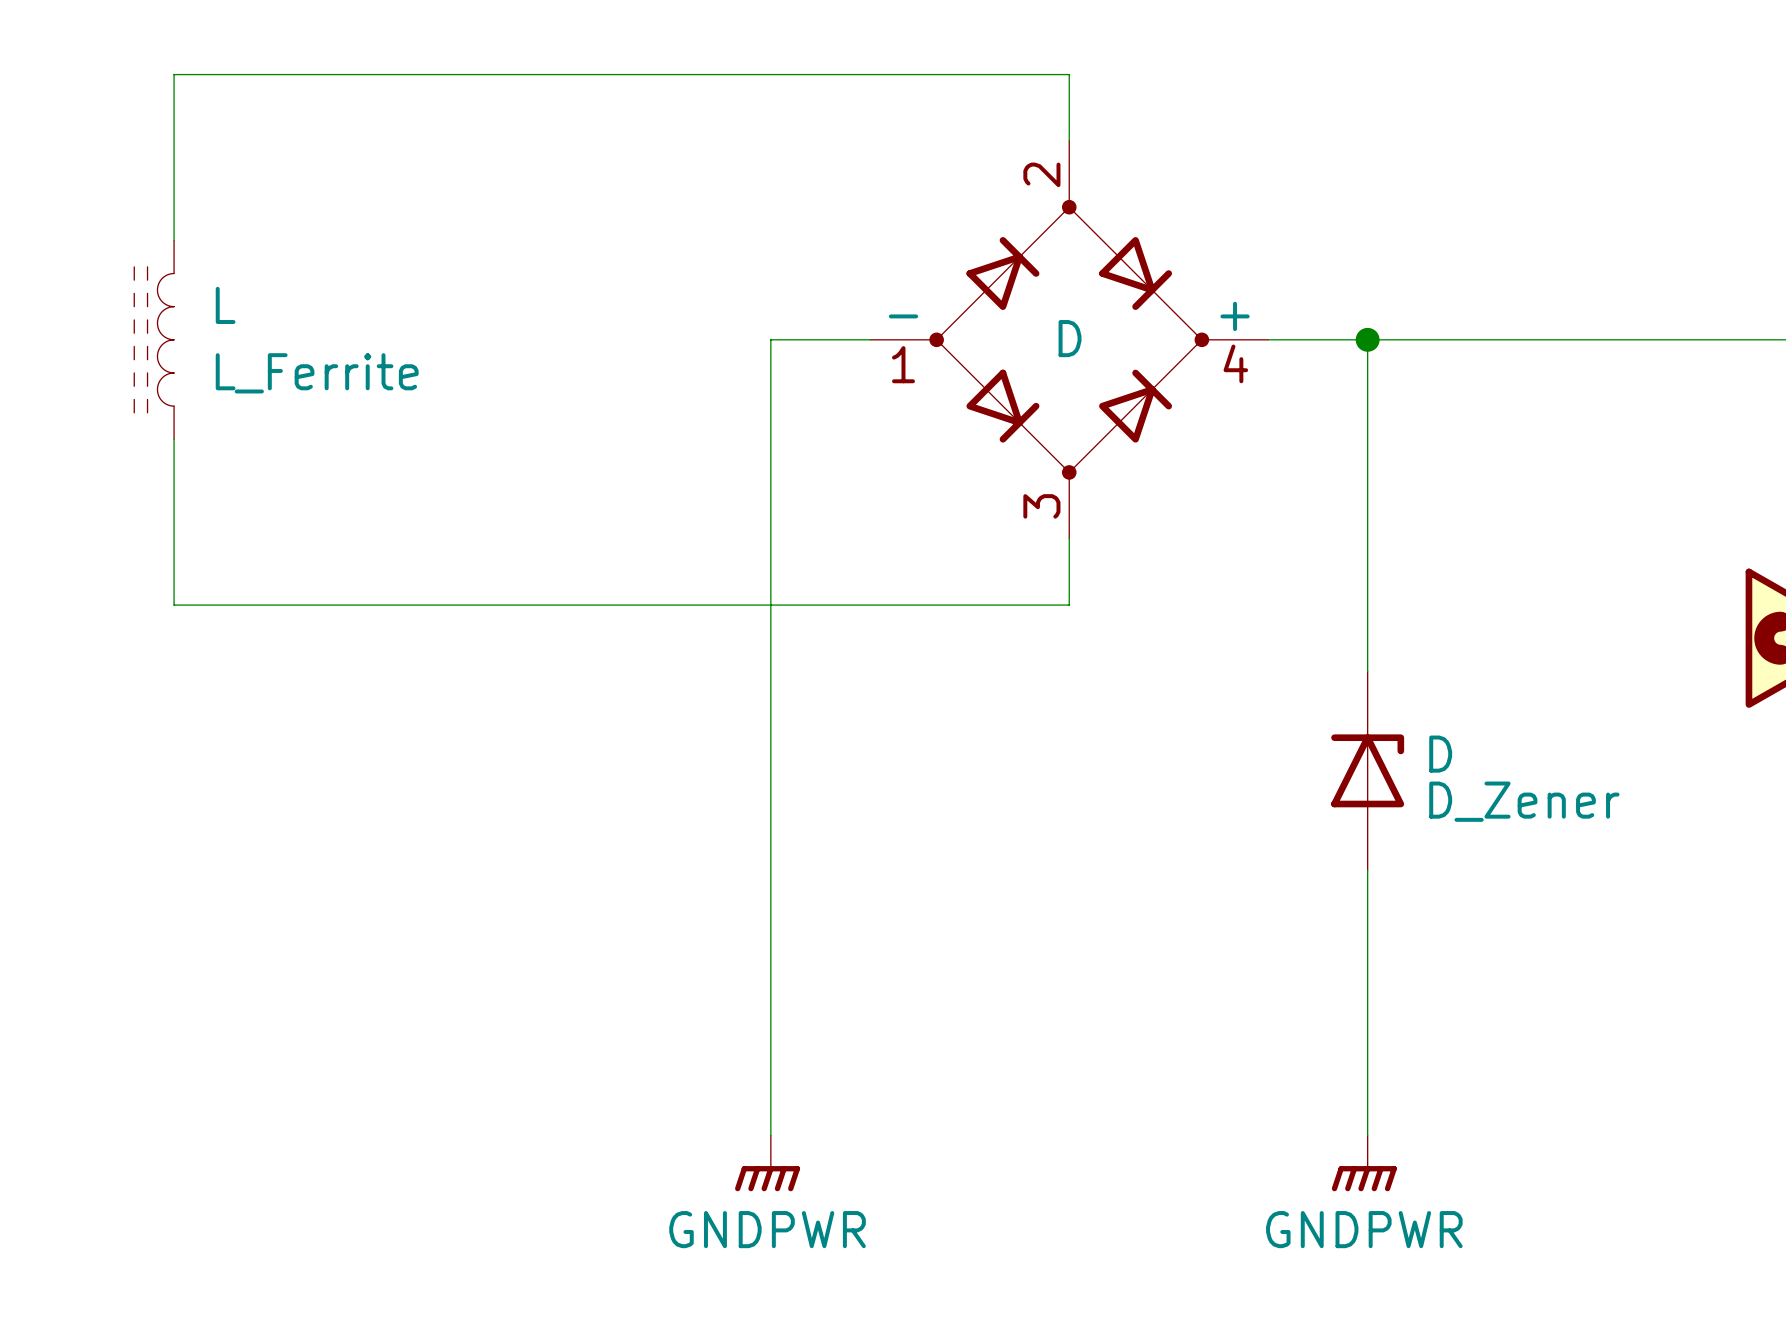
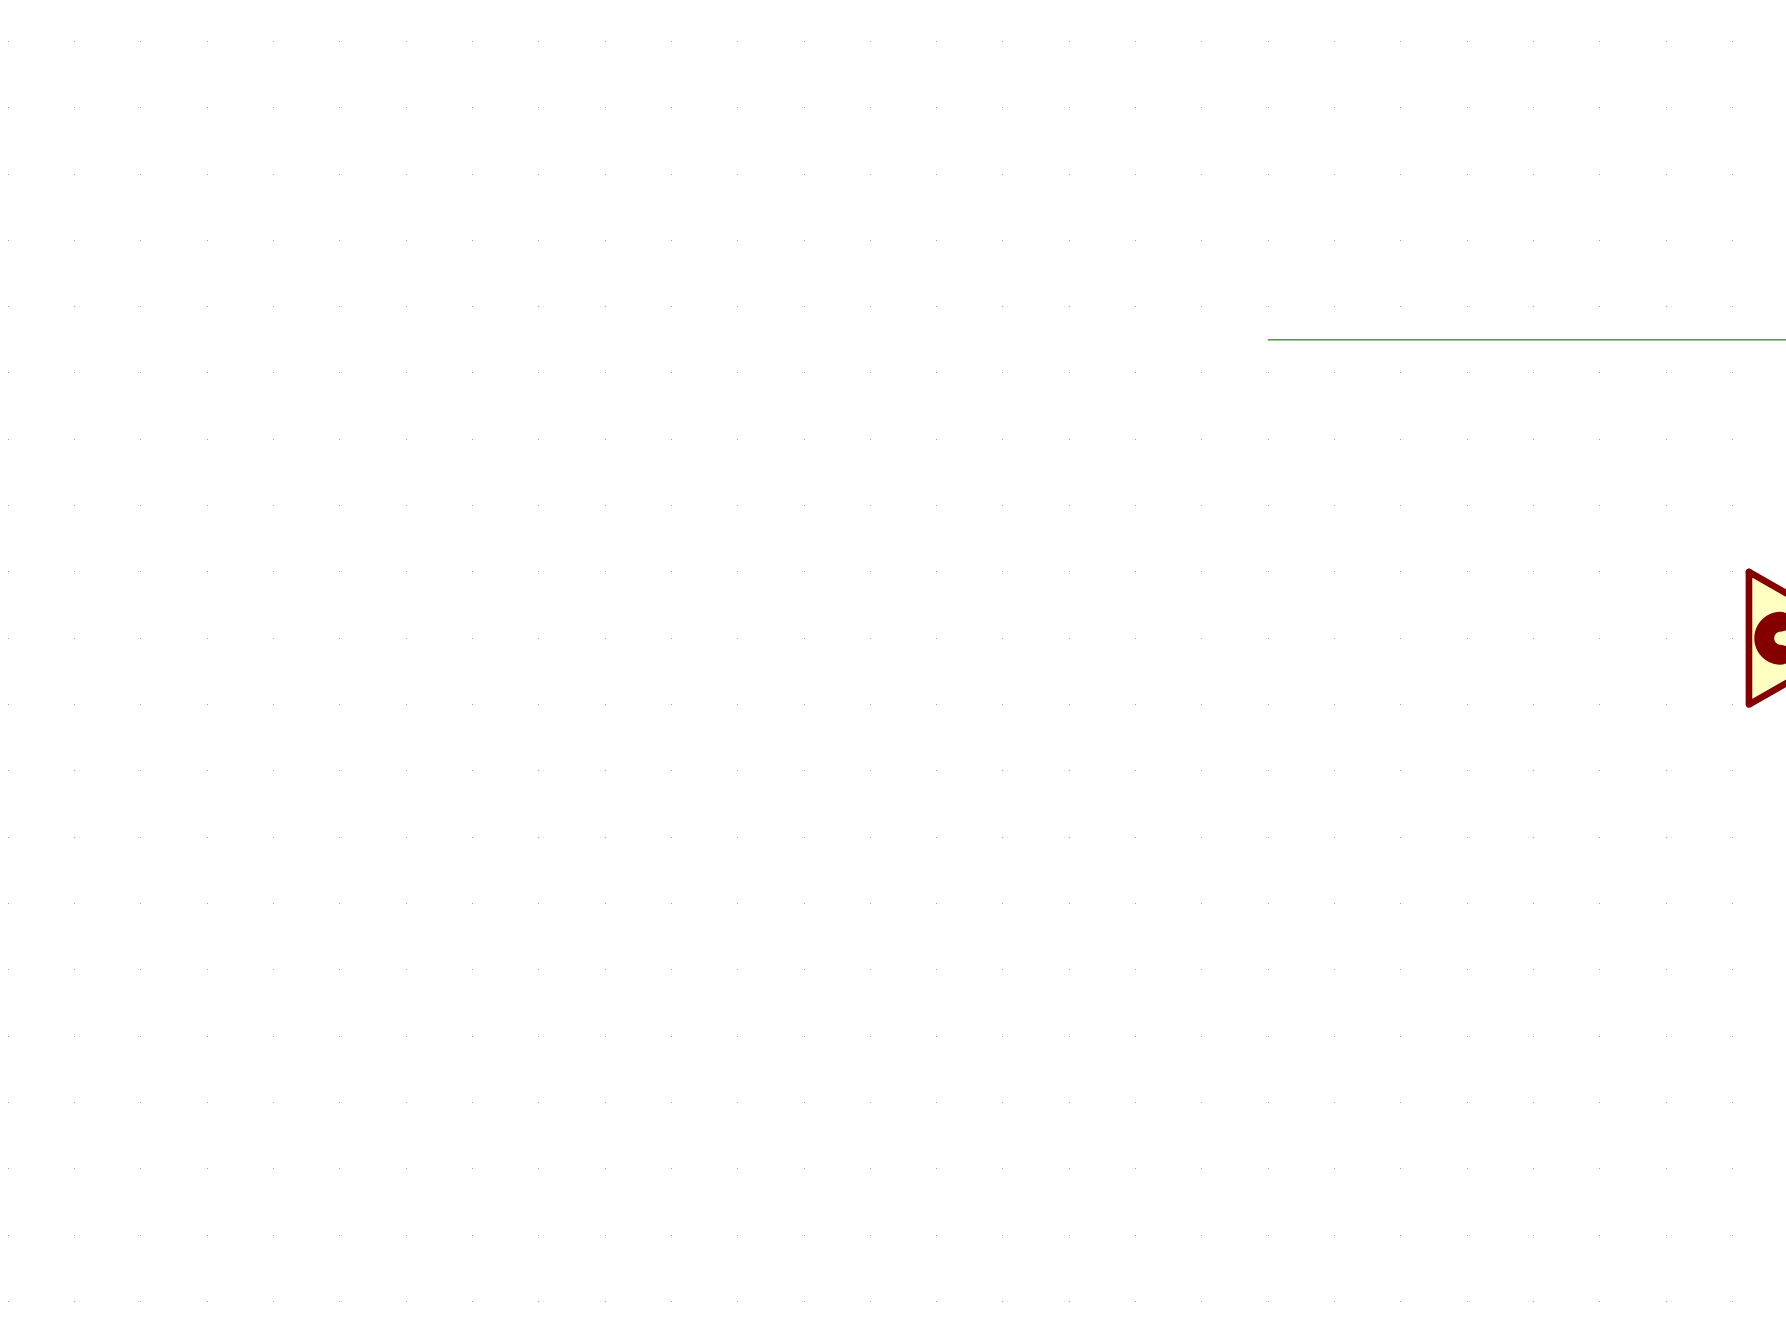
wire: (1069, 140) (1069, 74) (174, 74) (174, 240) -> none
L: L_Ferrite (154, 339) -> none
wire: (870, 339) (770, 339) (770, 1135) -> none
D: (1069, 339) -> none
wire: (1367, 339) (1367, 671) -> none
junction: (1367, 339) -> none
wire: (174, 439) (174, 605) (1069, 605) (1069, 538) -> none
D: D_Zener (1367, 770) -> none
wire: (1367, 870) (1367, 1135) -> none
power symbol: GNDPWR (767, 1163) -> none
power symbol: GNDPWR (1364, 1163) -> none

